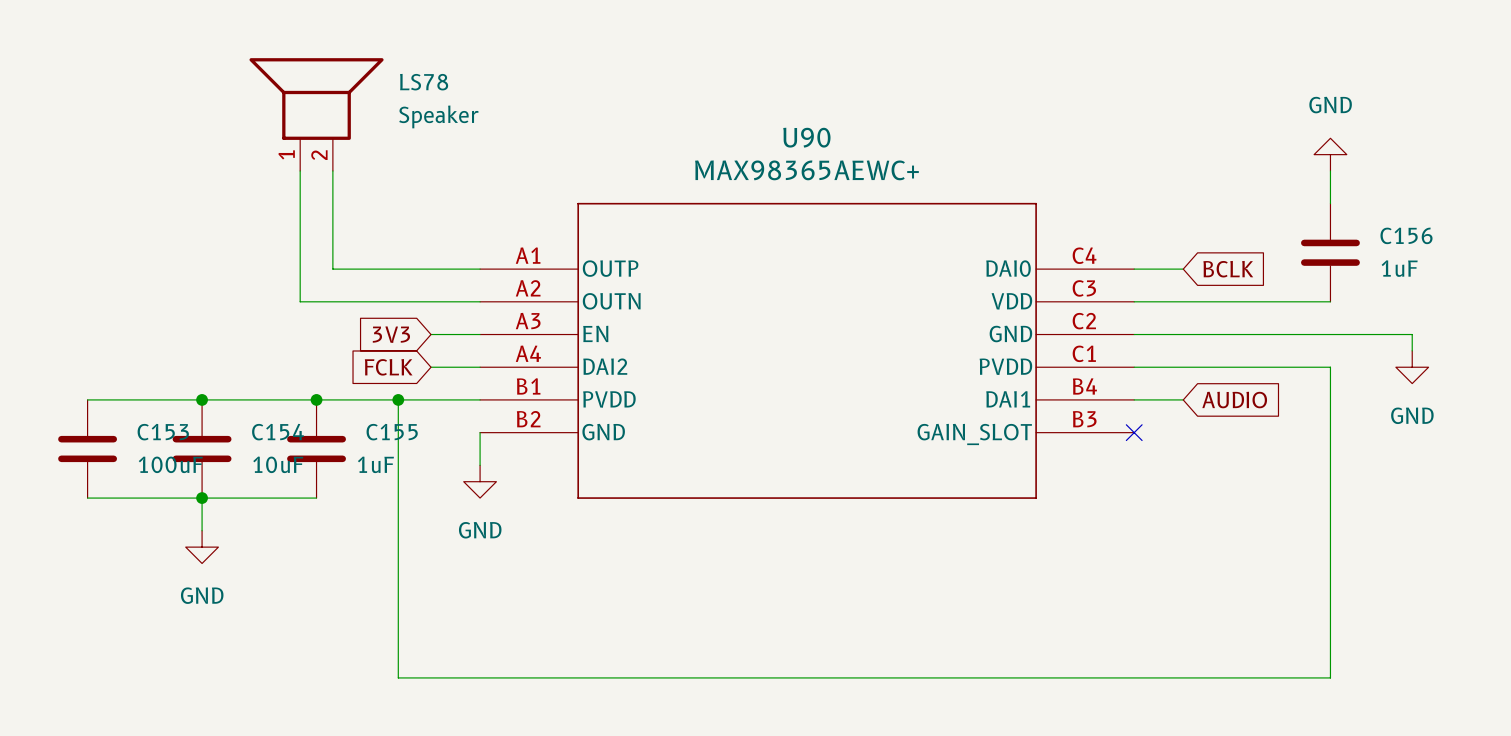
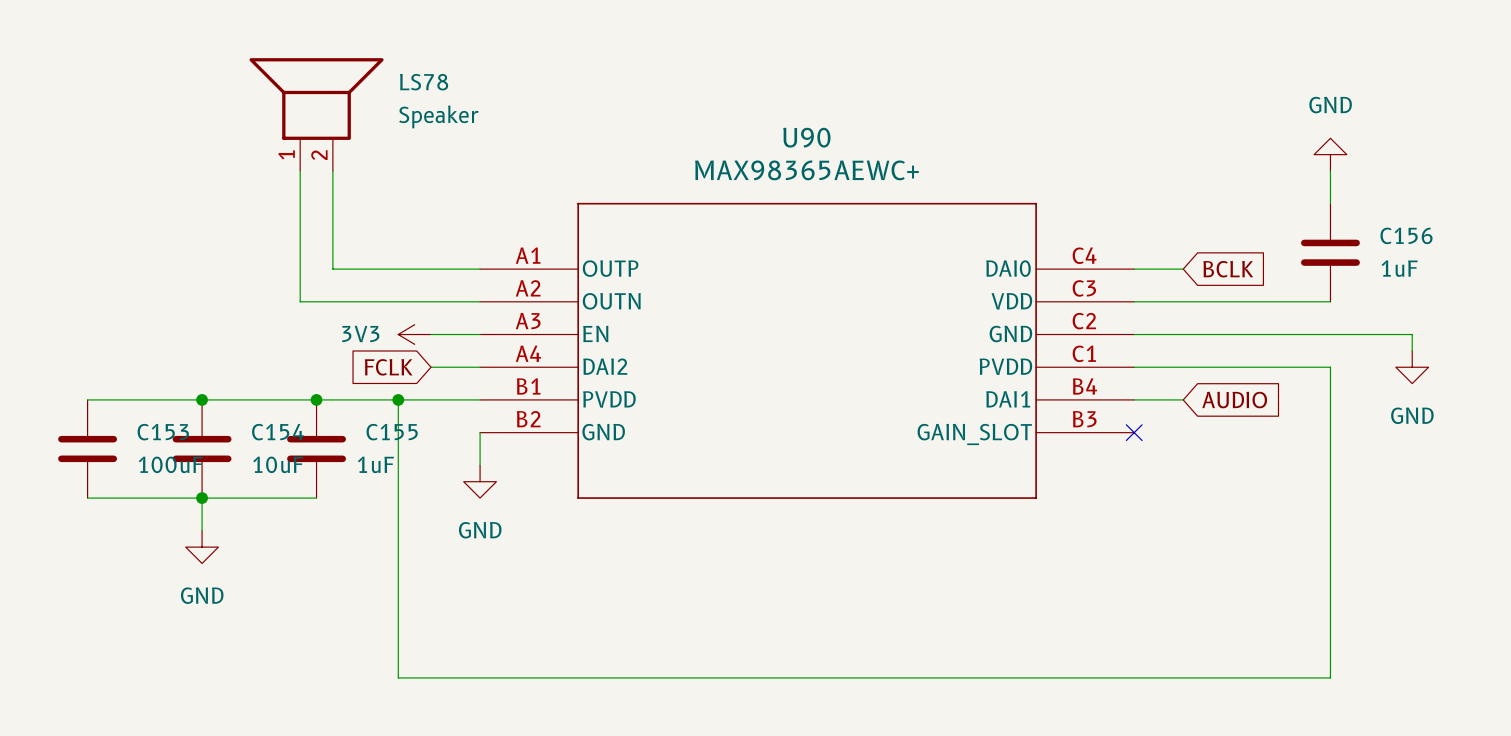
global label: 3V3 (391, 334) -> none
power symbol: none -> 3V3 (414, 334)

